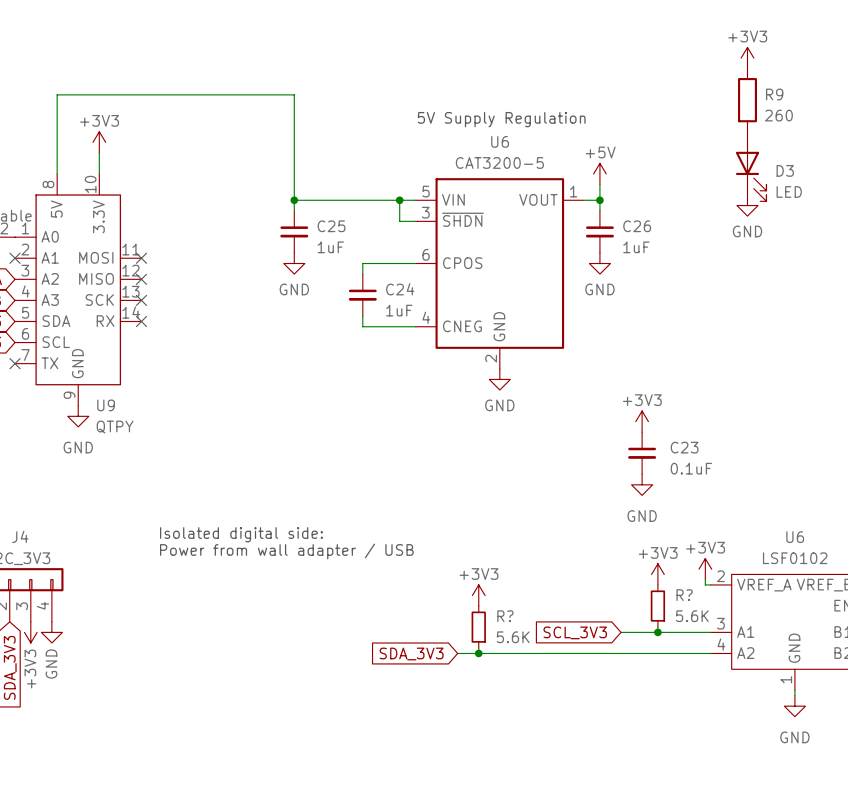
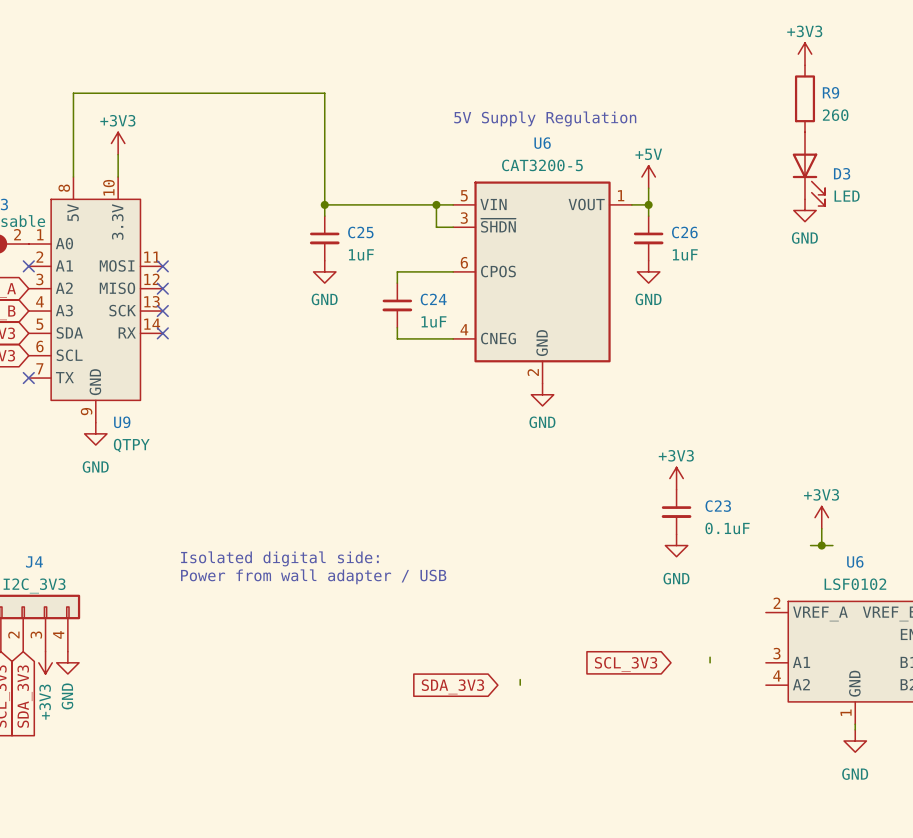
power symbol position: +3V3 (642, 421) -> +3V3 (676, 478)
C23 position: (642, 453) -> (676, 512)
power symbol position: GND (642, 484) -> GND (676, 545)
power symbol: none -> +3V3 (821, 517)
wire: none -> (821, 528) (821, 545)
wire: none -> (810, 545) (832, 545)
junction: none -> (821, 545)
power symbol: +3V3 (705, 569) -> none
power symbol: +3V3 (657, 574) -> none
wire: (705, 579) (705, 584) (710, 584) -> none
power symbol: +3V3 (478, 595) -> none
R?: 5.6K (657, 606) -> none
R?: 5.6K (478, 627) -> none
wire: (621, 632) (710, 632) -> none
junction: (657, 632) -> none
wire: (457, 653) (710, 653) -> none
junction: (478, 653) -> none

